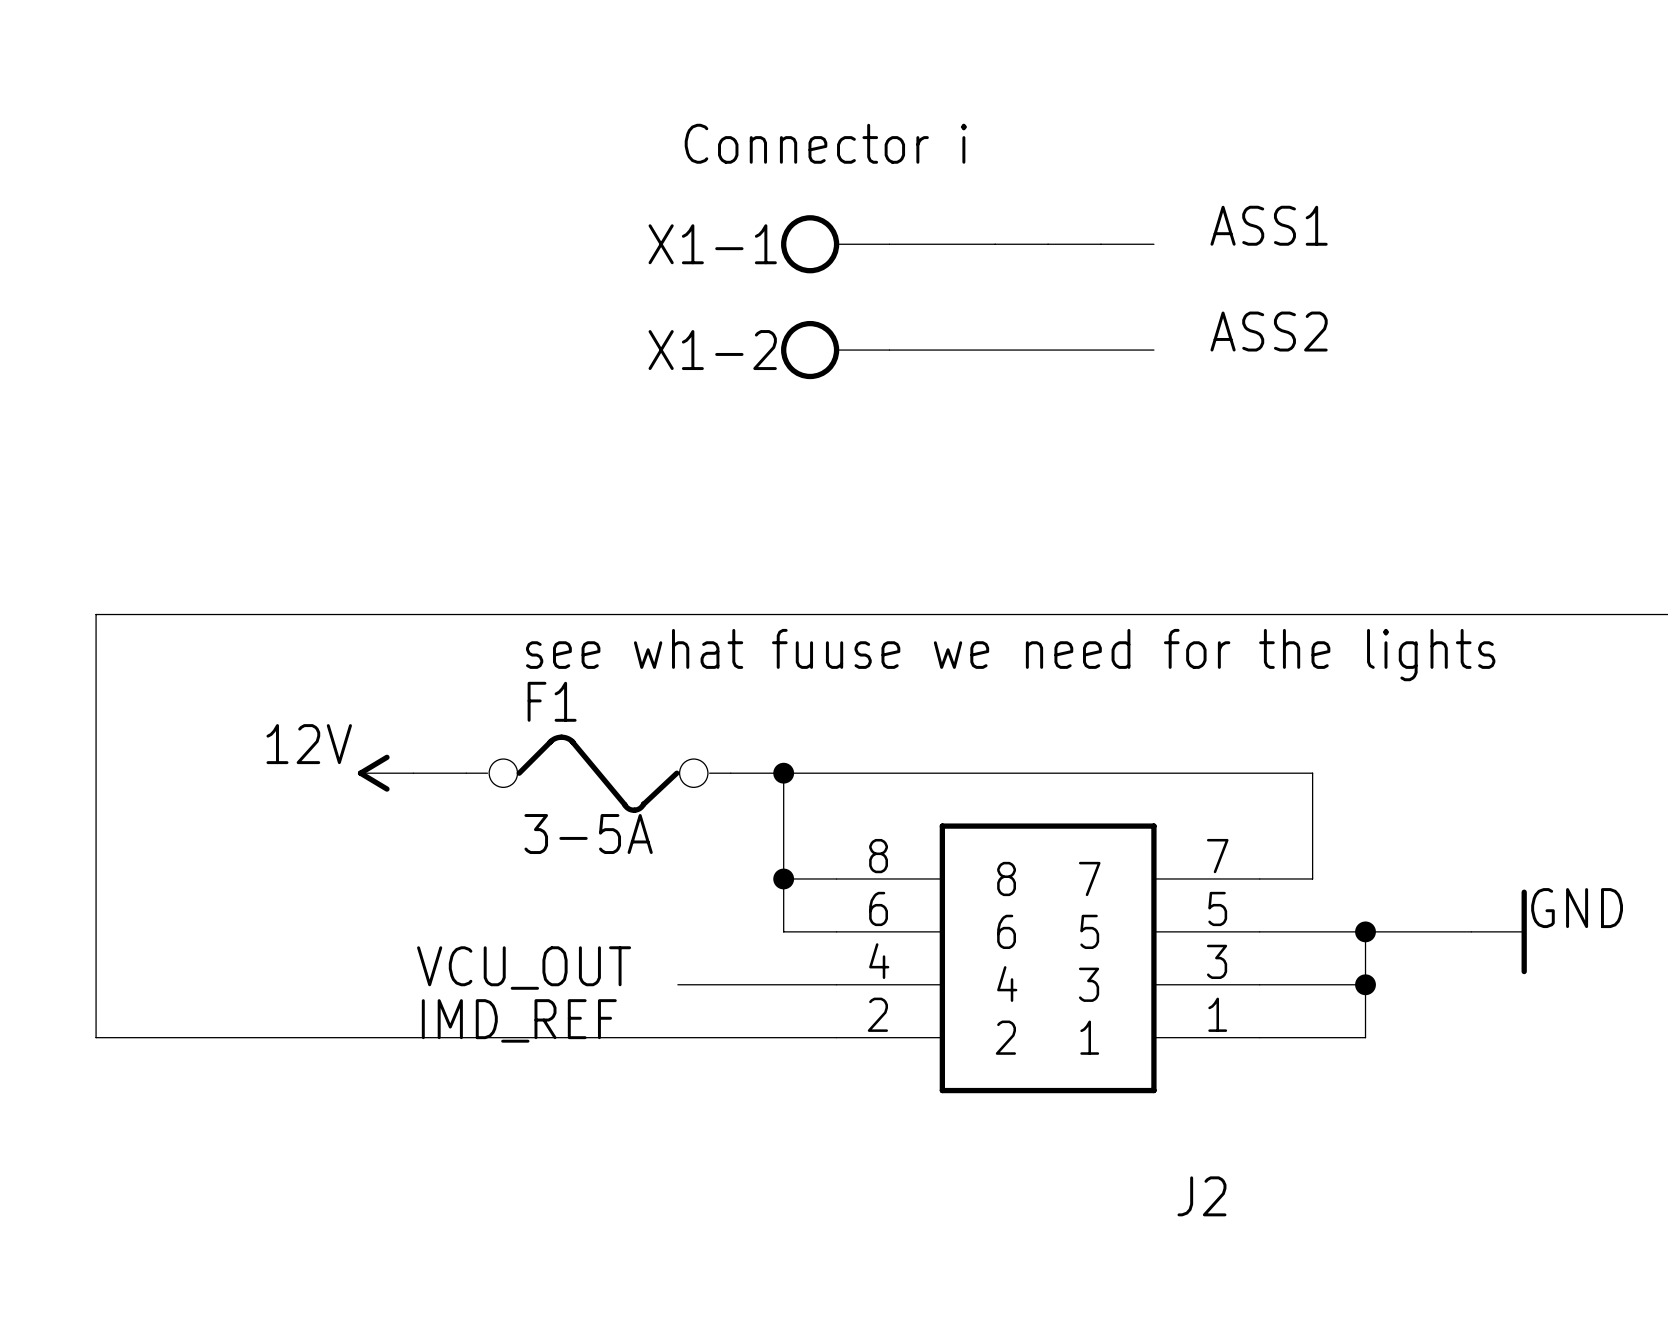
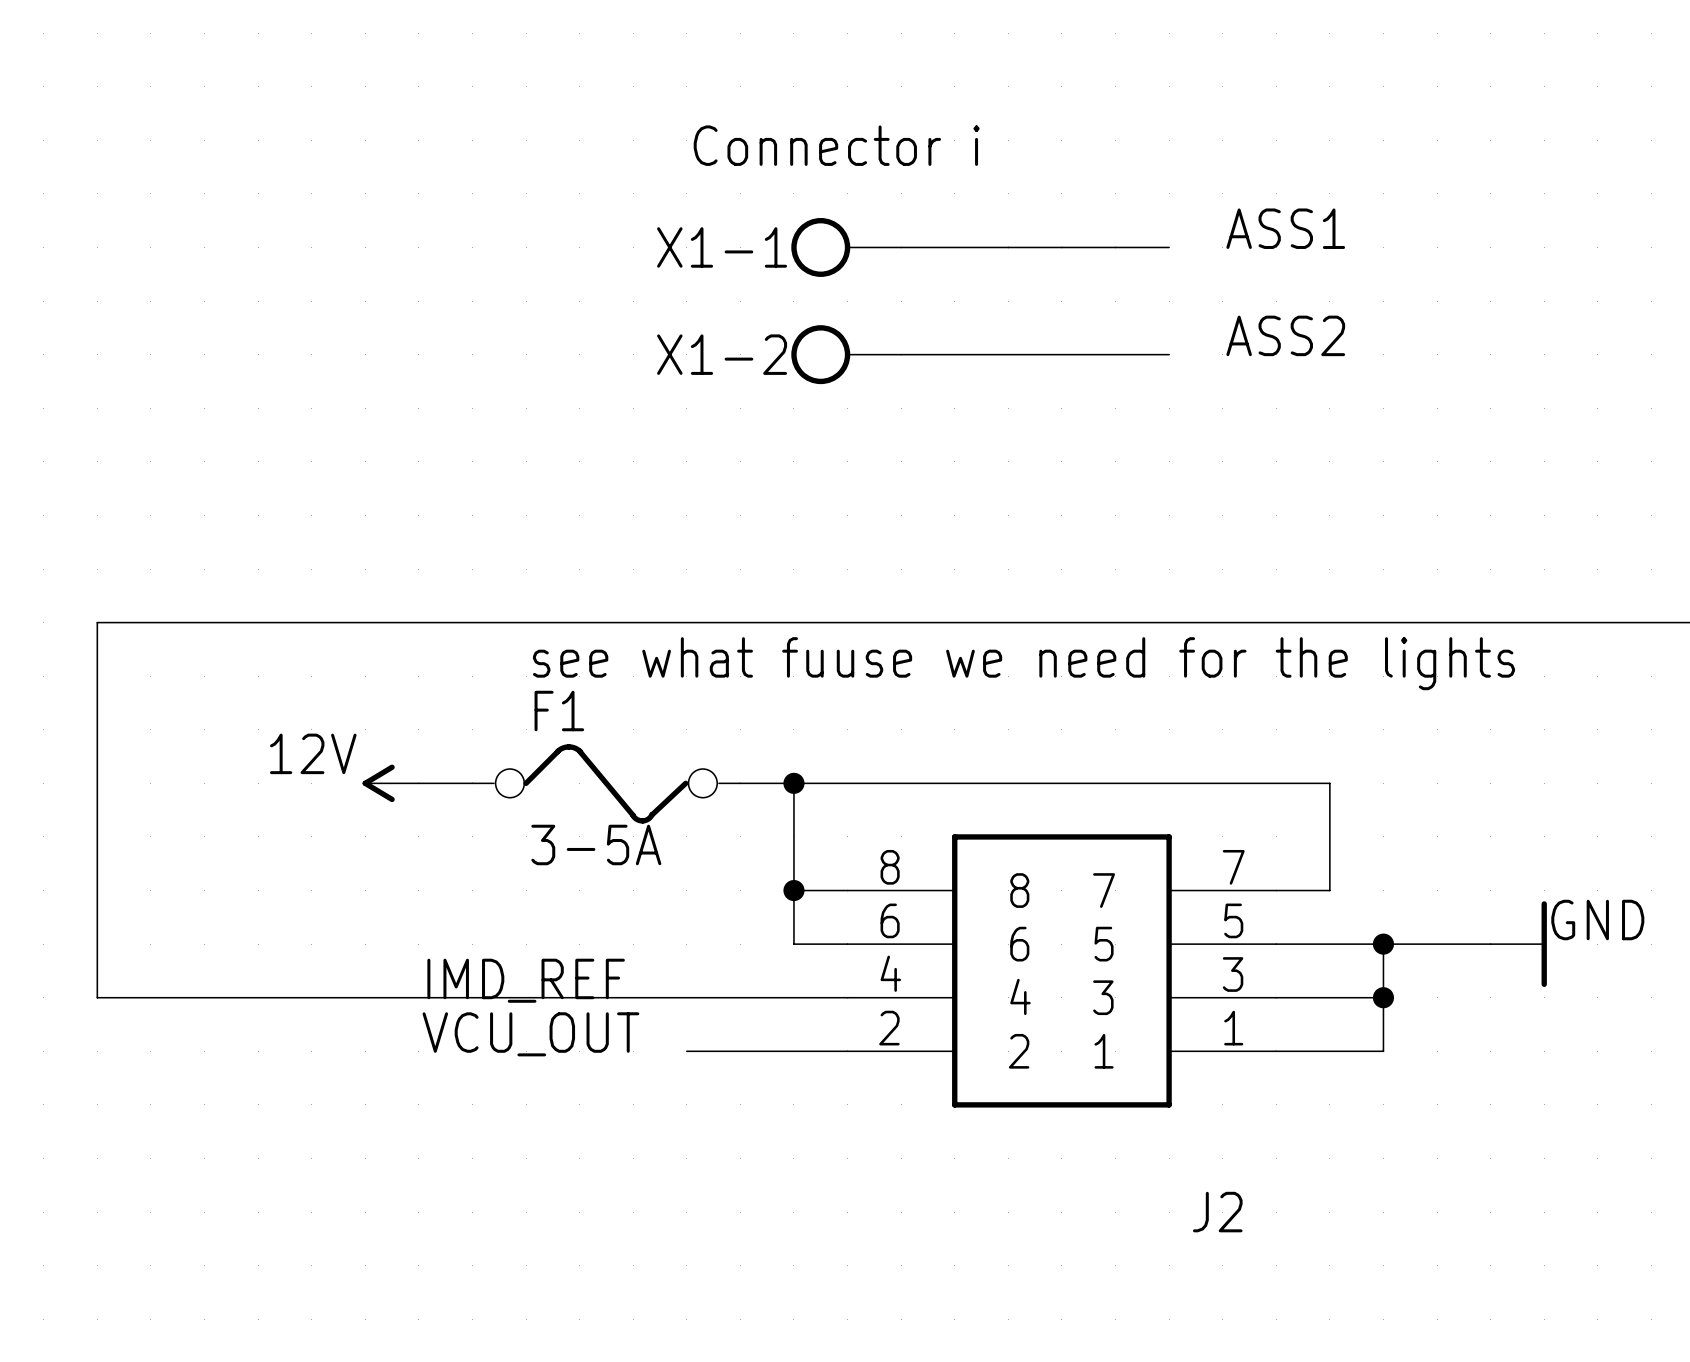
label: VCU_OUT (524, 968) -> IMD_REF (526, 980)
wire: (96, 984) (96, 1037) (677, 1037) -> (97, 997) (686, 997)
label: IMD_REF (519, 1020) -> VCU_OUT (530, 1034)

